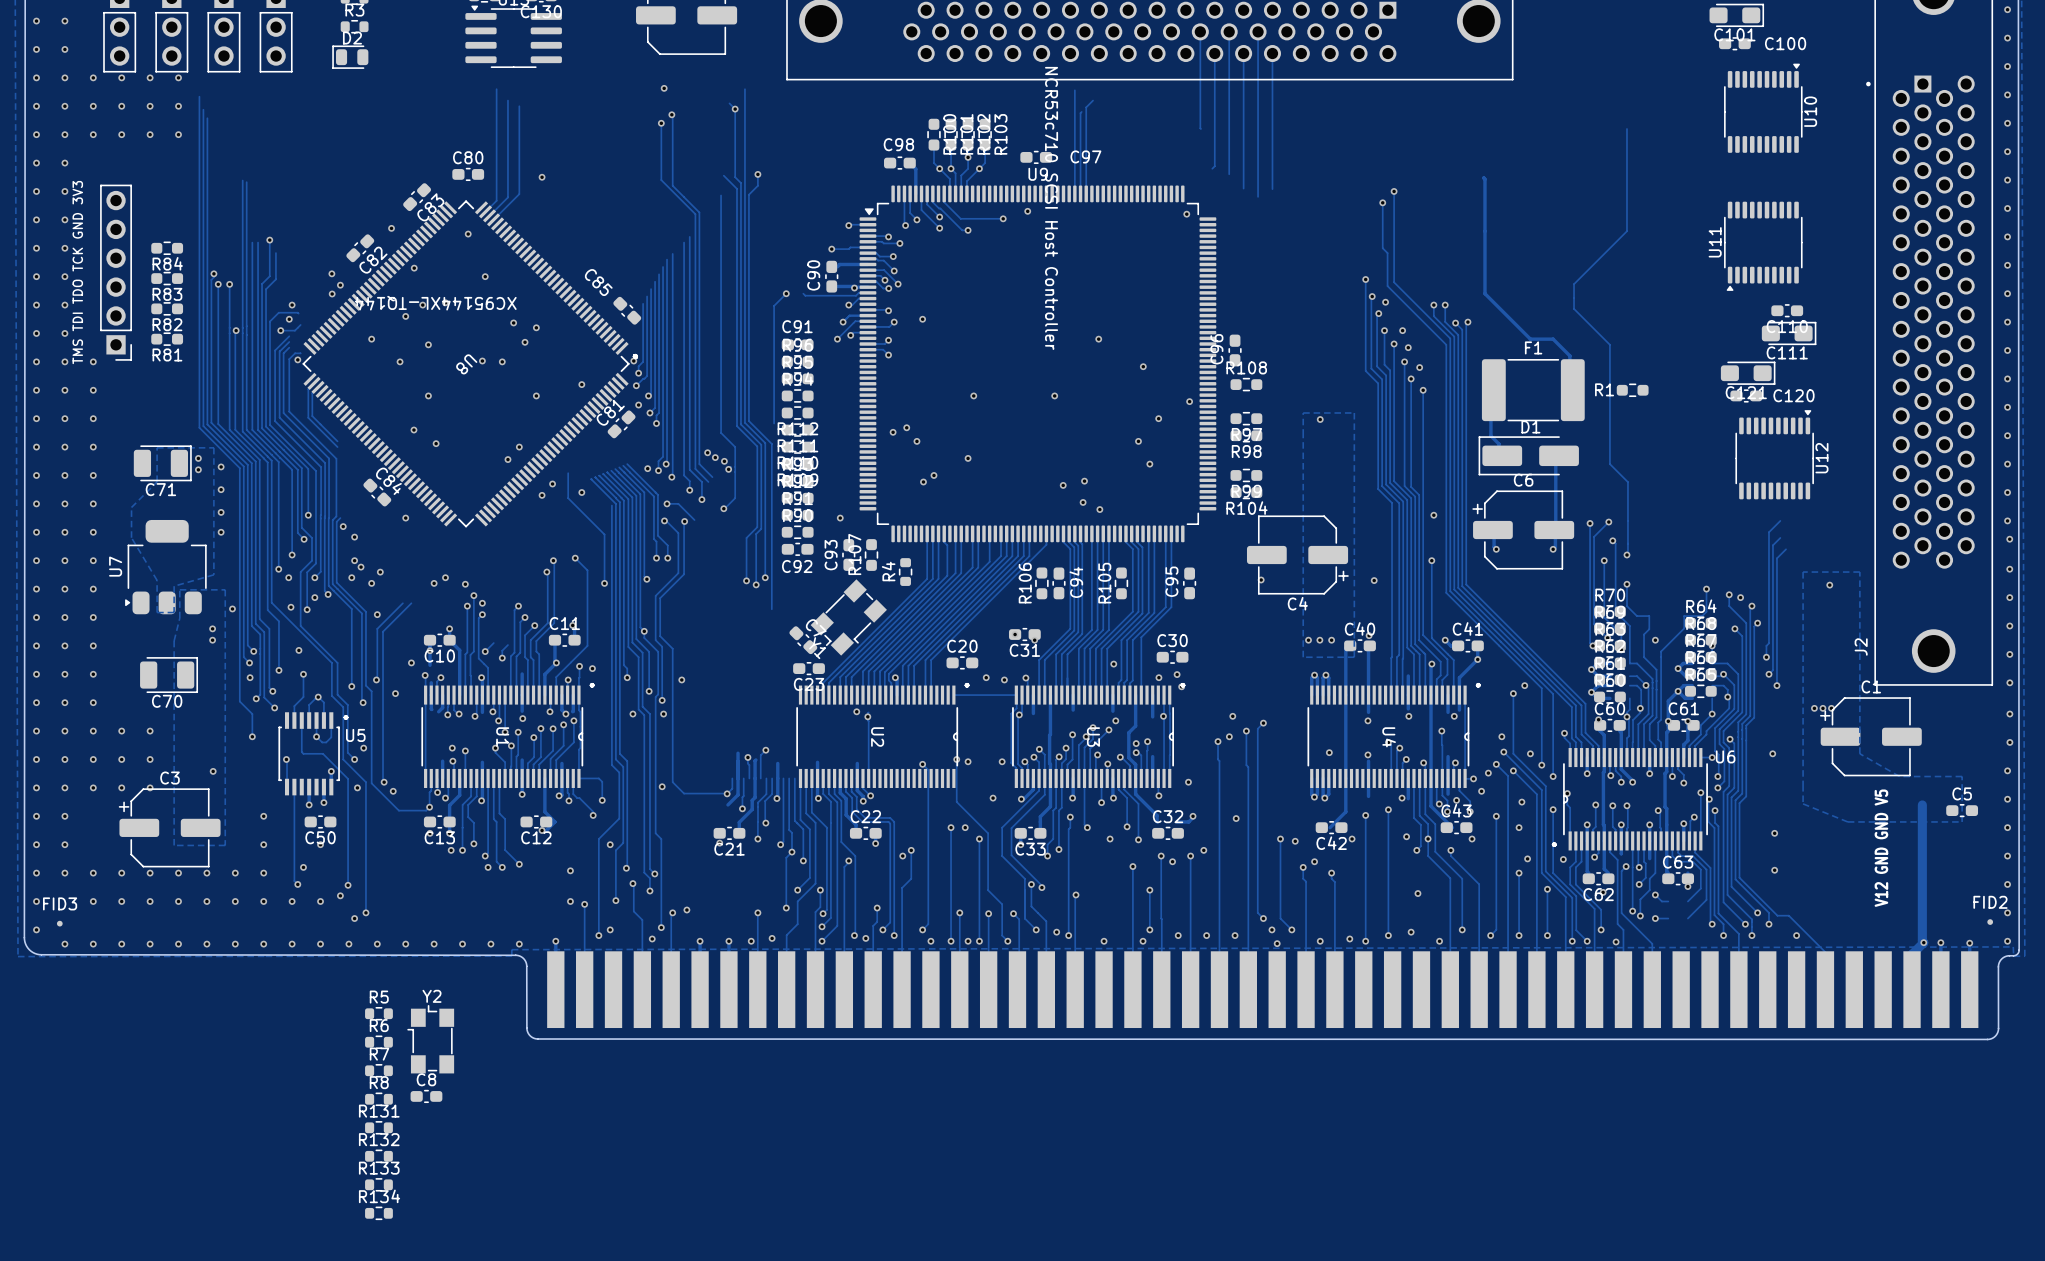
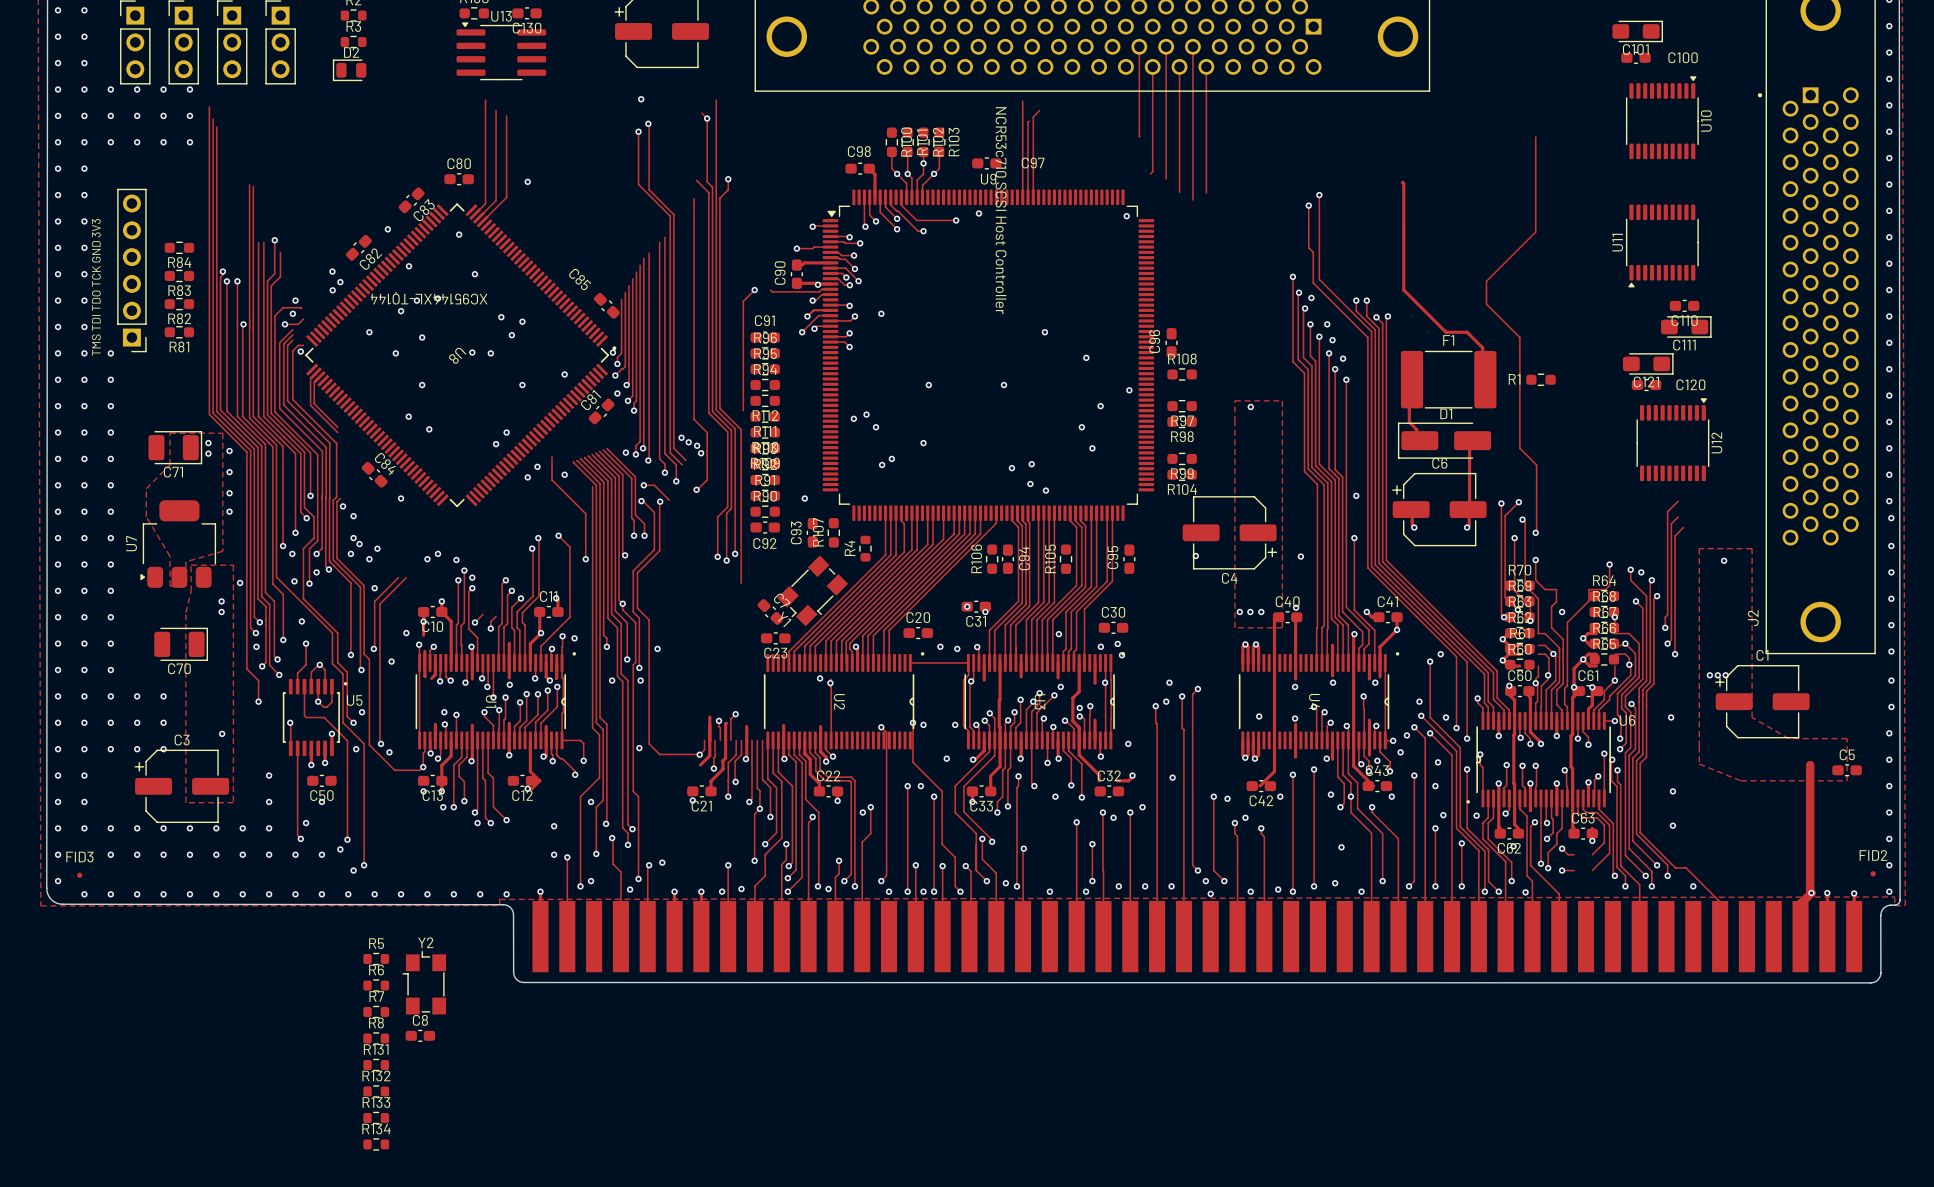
text: V12 GND GND V5 (1881, 848) -> none

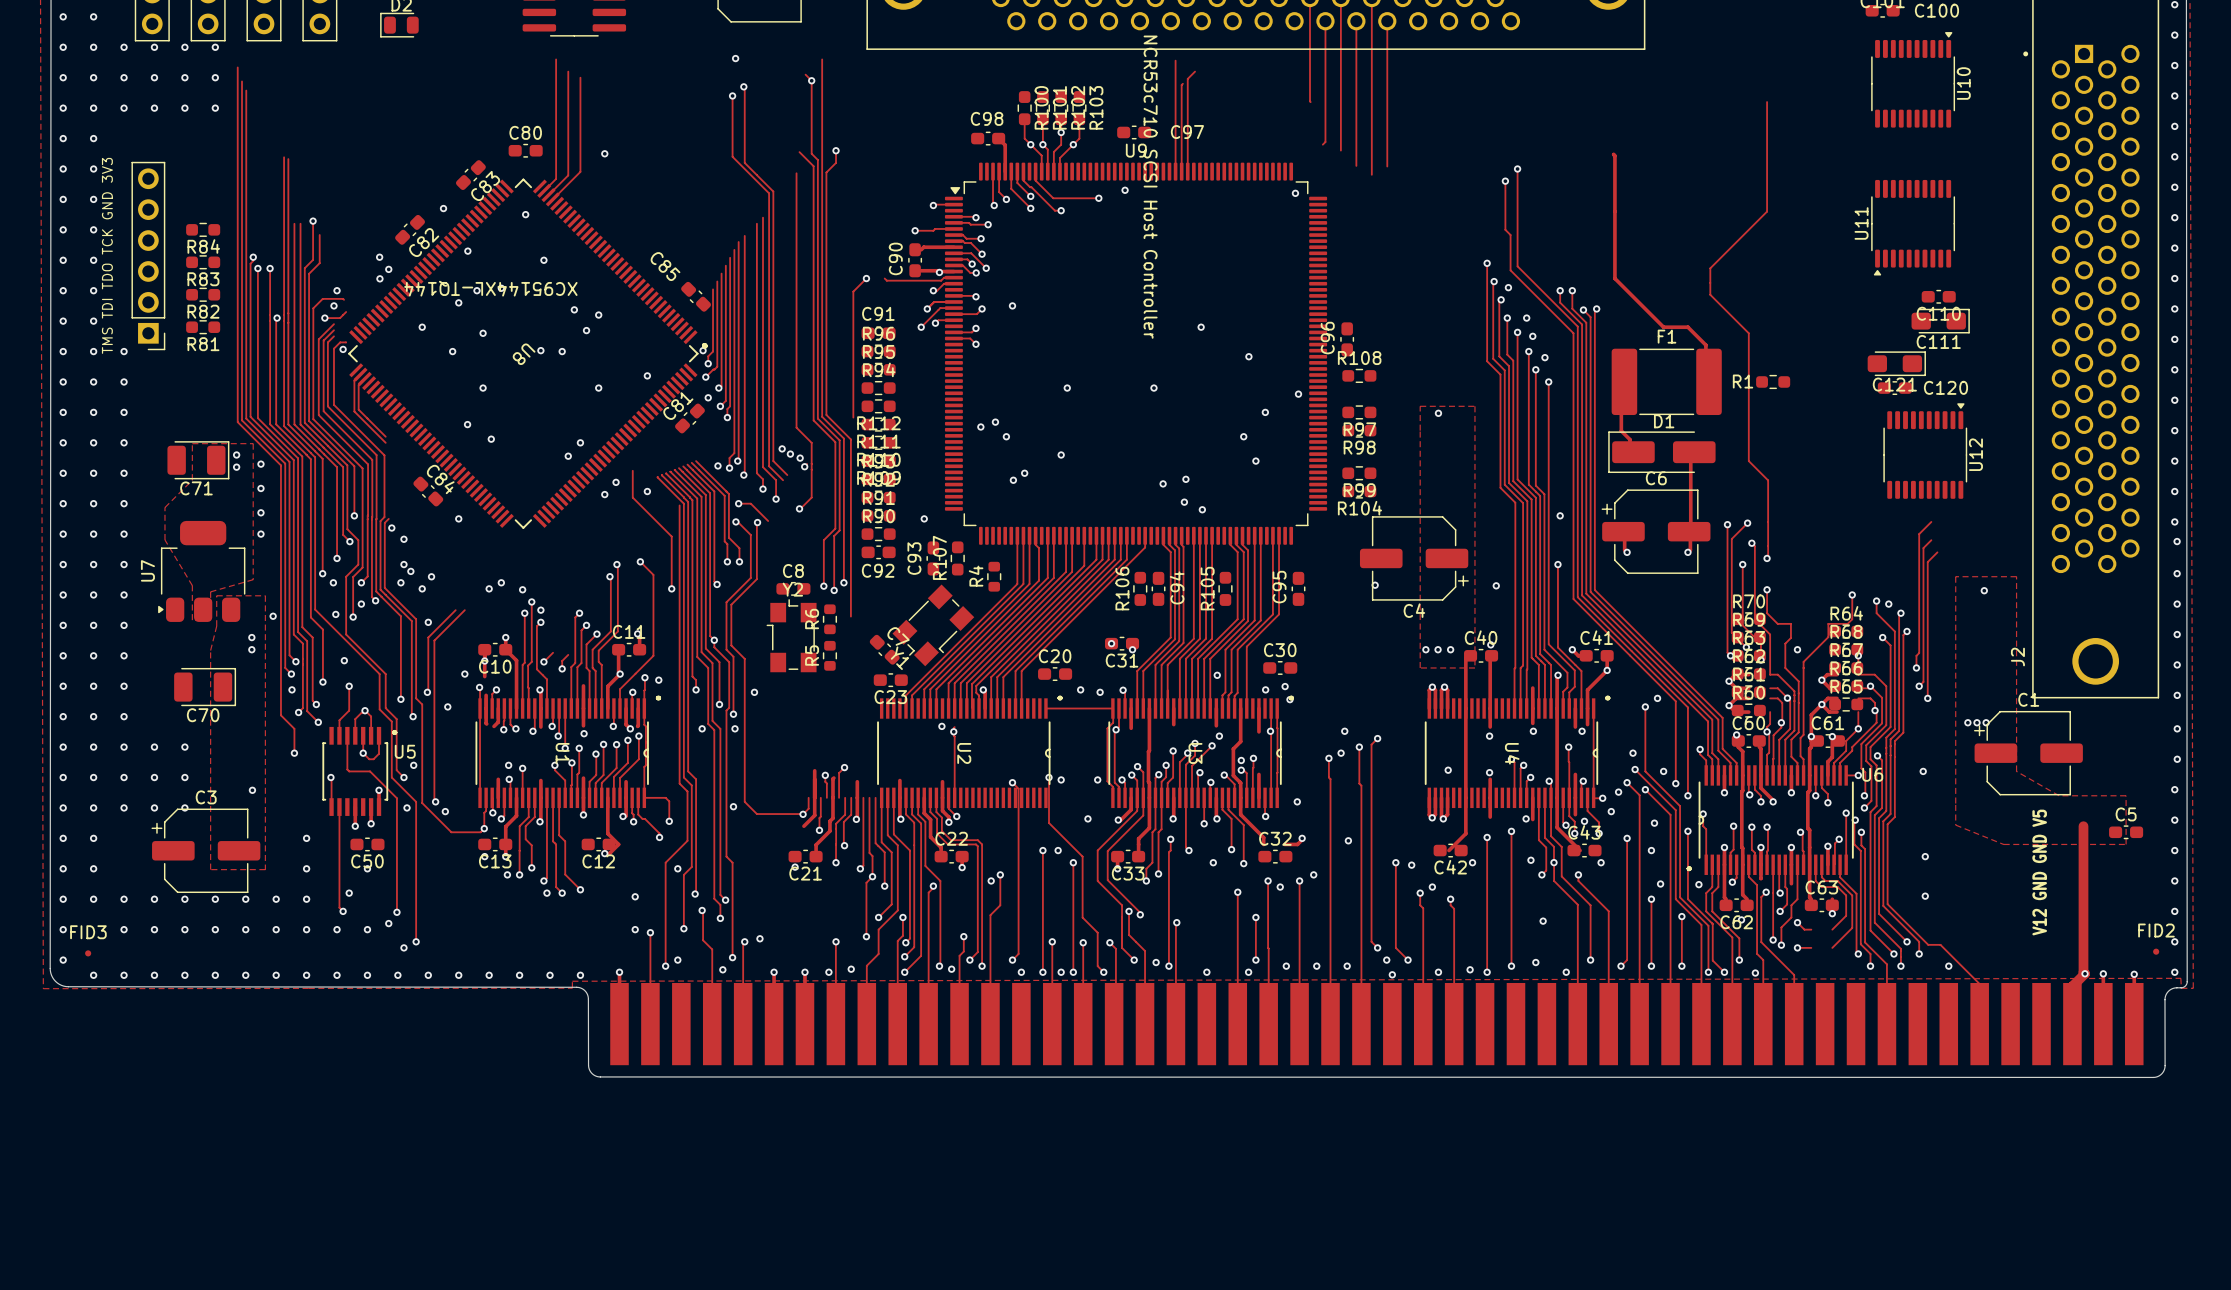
text: none -> V12 GND GND V5 (2039, 872)
R5 name position: R5 (376, 943) -> R5 (812, 655)
R5 rotation: 0° (376, 959) -> 90° clockwise (829, 655)
R5 position: (376, 959) -> (829, 655)
R6 name position: R6 (376, 970) -> R6 (812, 619)
Y2 position: (424, 982) -> (791, 635)
R6 rotation: 0° (376, 985) -> 90° clockwise (829, 619)
R6 position: (376, 985) -> (829, 619)
R7: (376, 1012) -> none
C8 position: (420, 1035) -> (793, 588)
R8: (376, 1038) -> none
R131: (376, 1064) -> none
R132: (376, 1091) -> none
R133: (376, 1117) -> none
R134: (376, 1144) -> none

